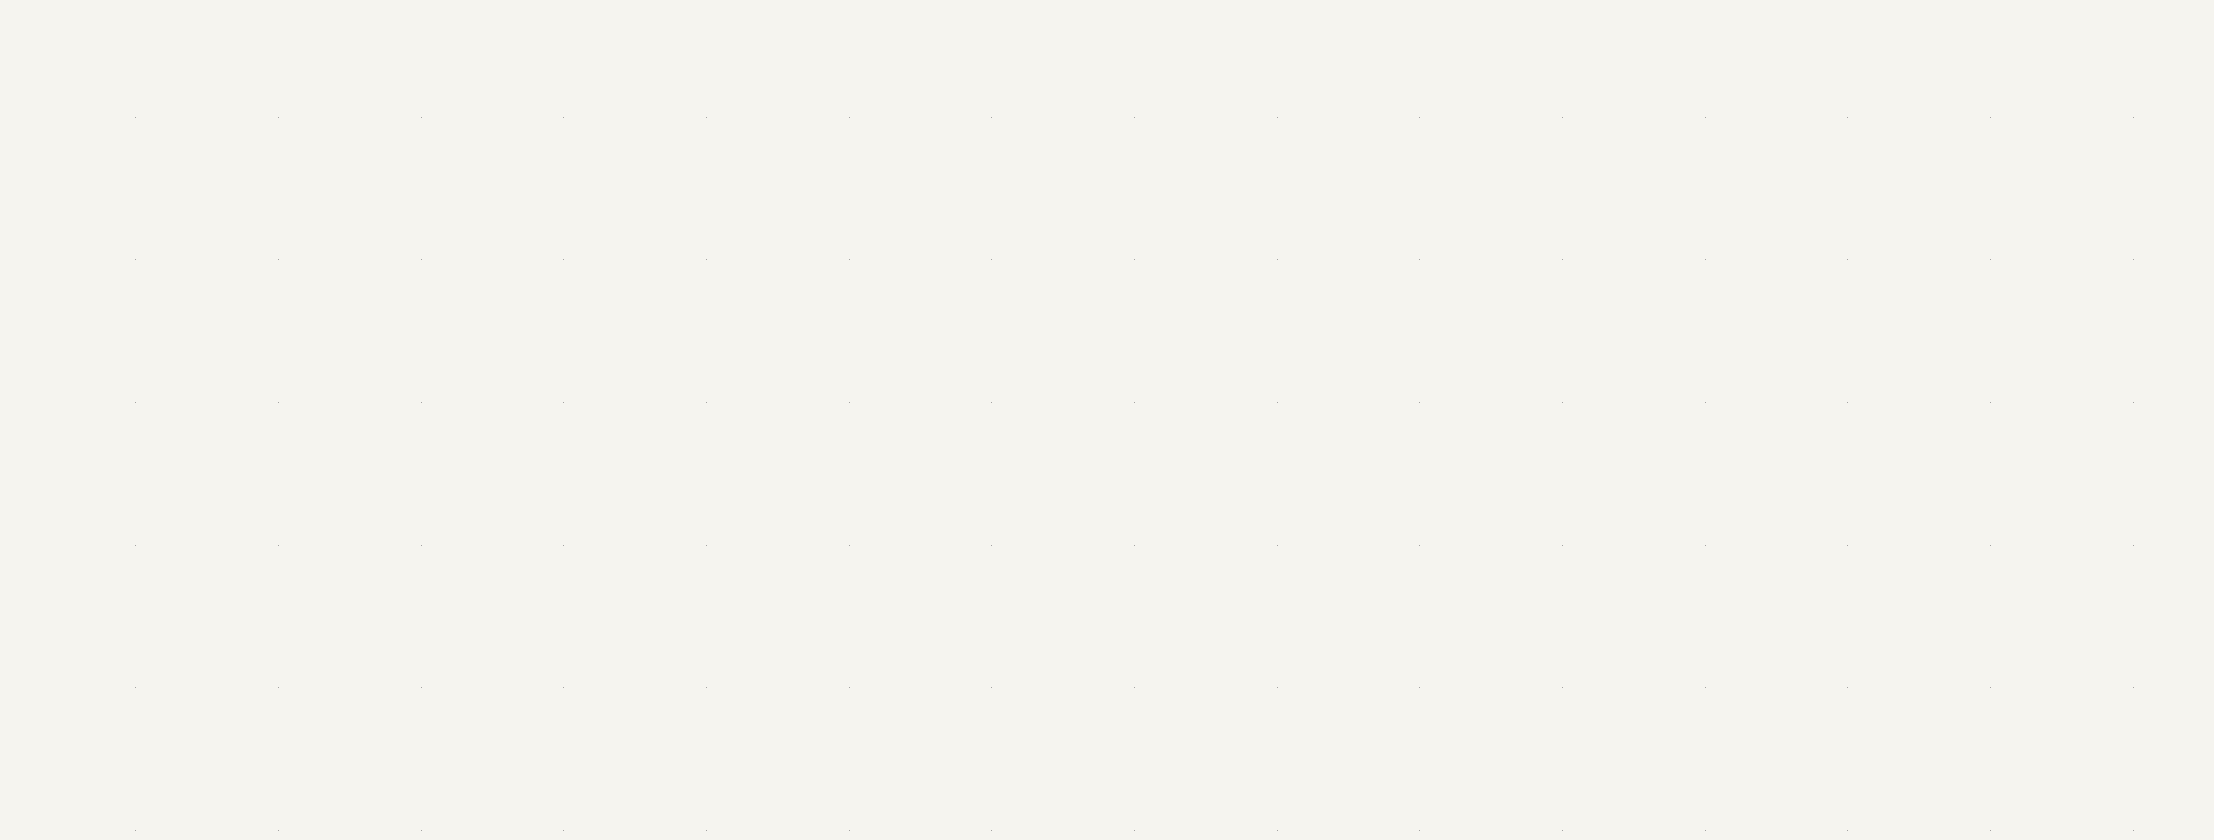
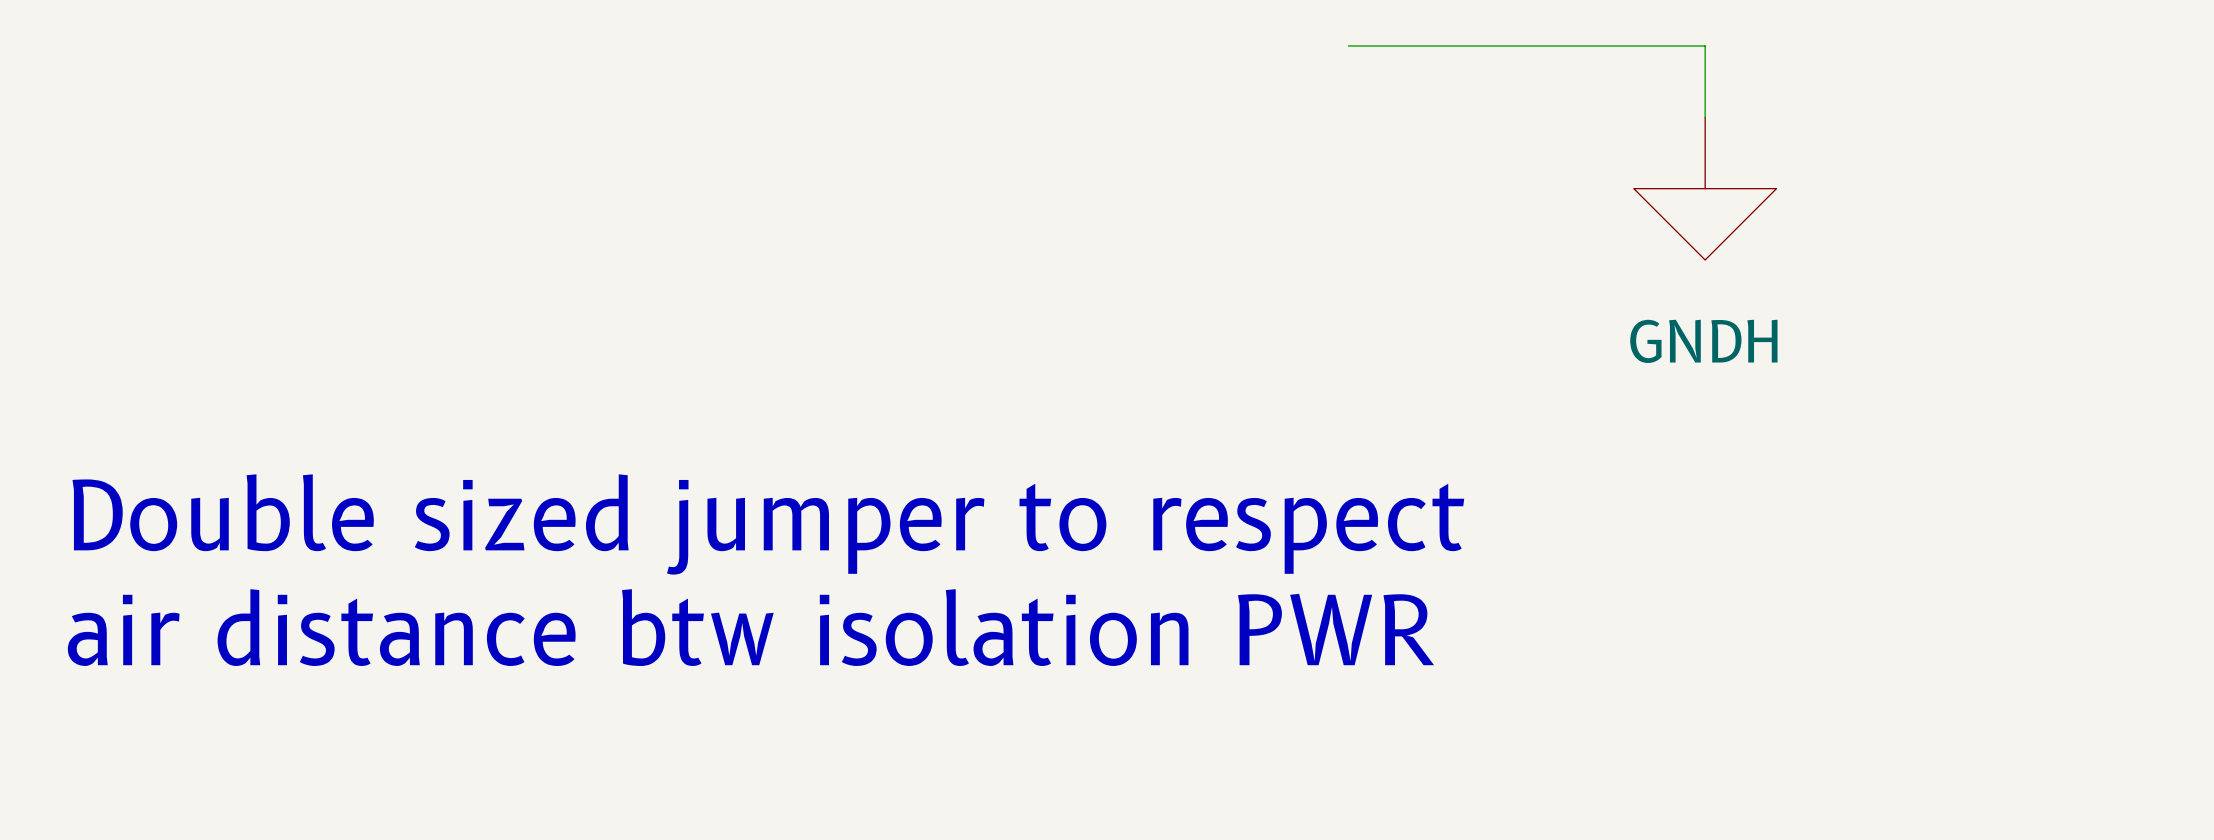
wire: none -> (1348, 45) (1705, 45) (1705, 117)
power symbol: none -> GNDH (1705, 188)
text: none -> Double sized jumper to respect (768, 524)
text: none -> air distance btw isolation PWR (750, 627)

